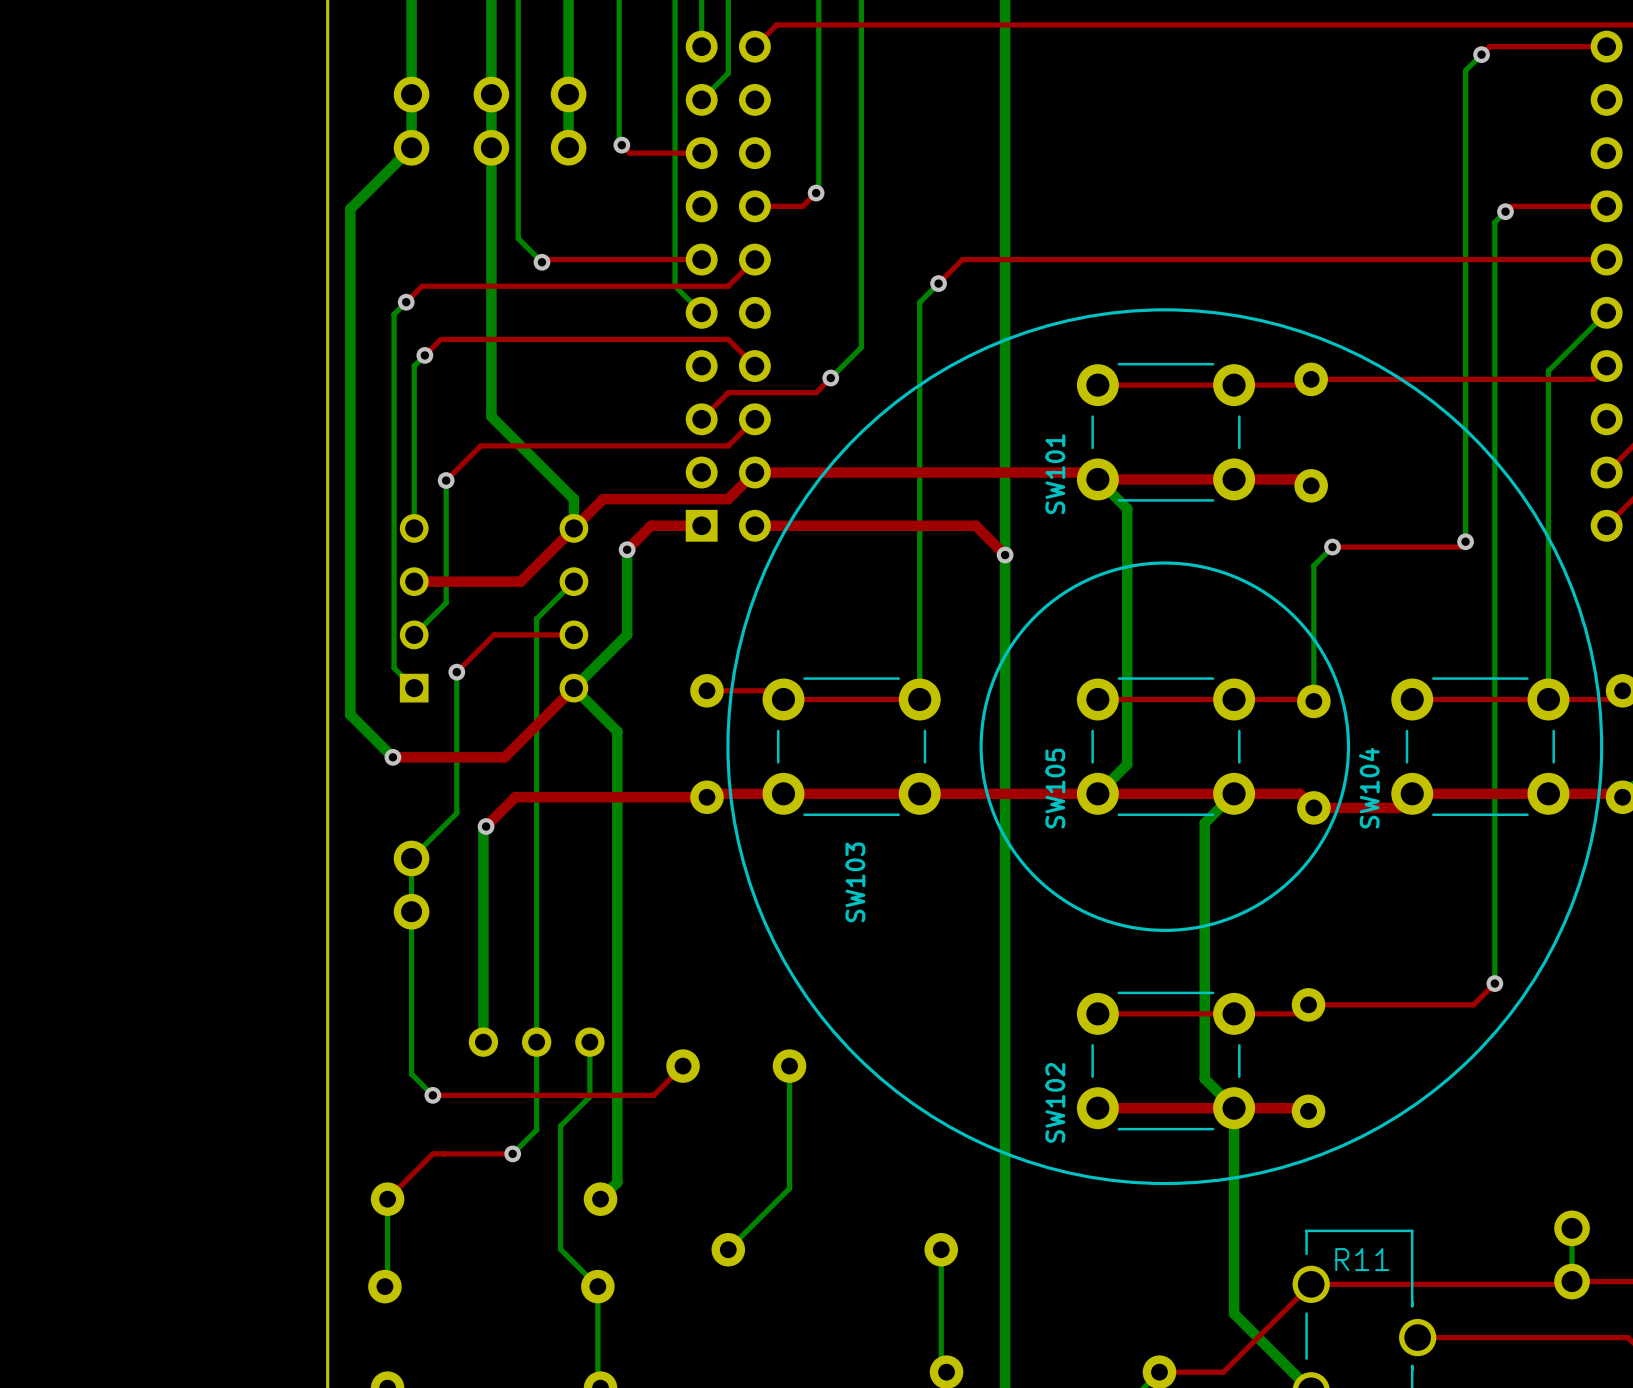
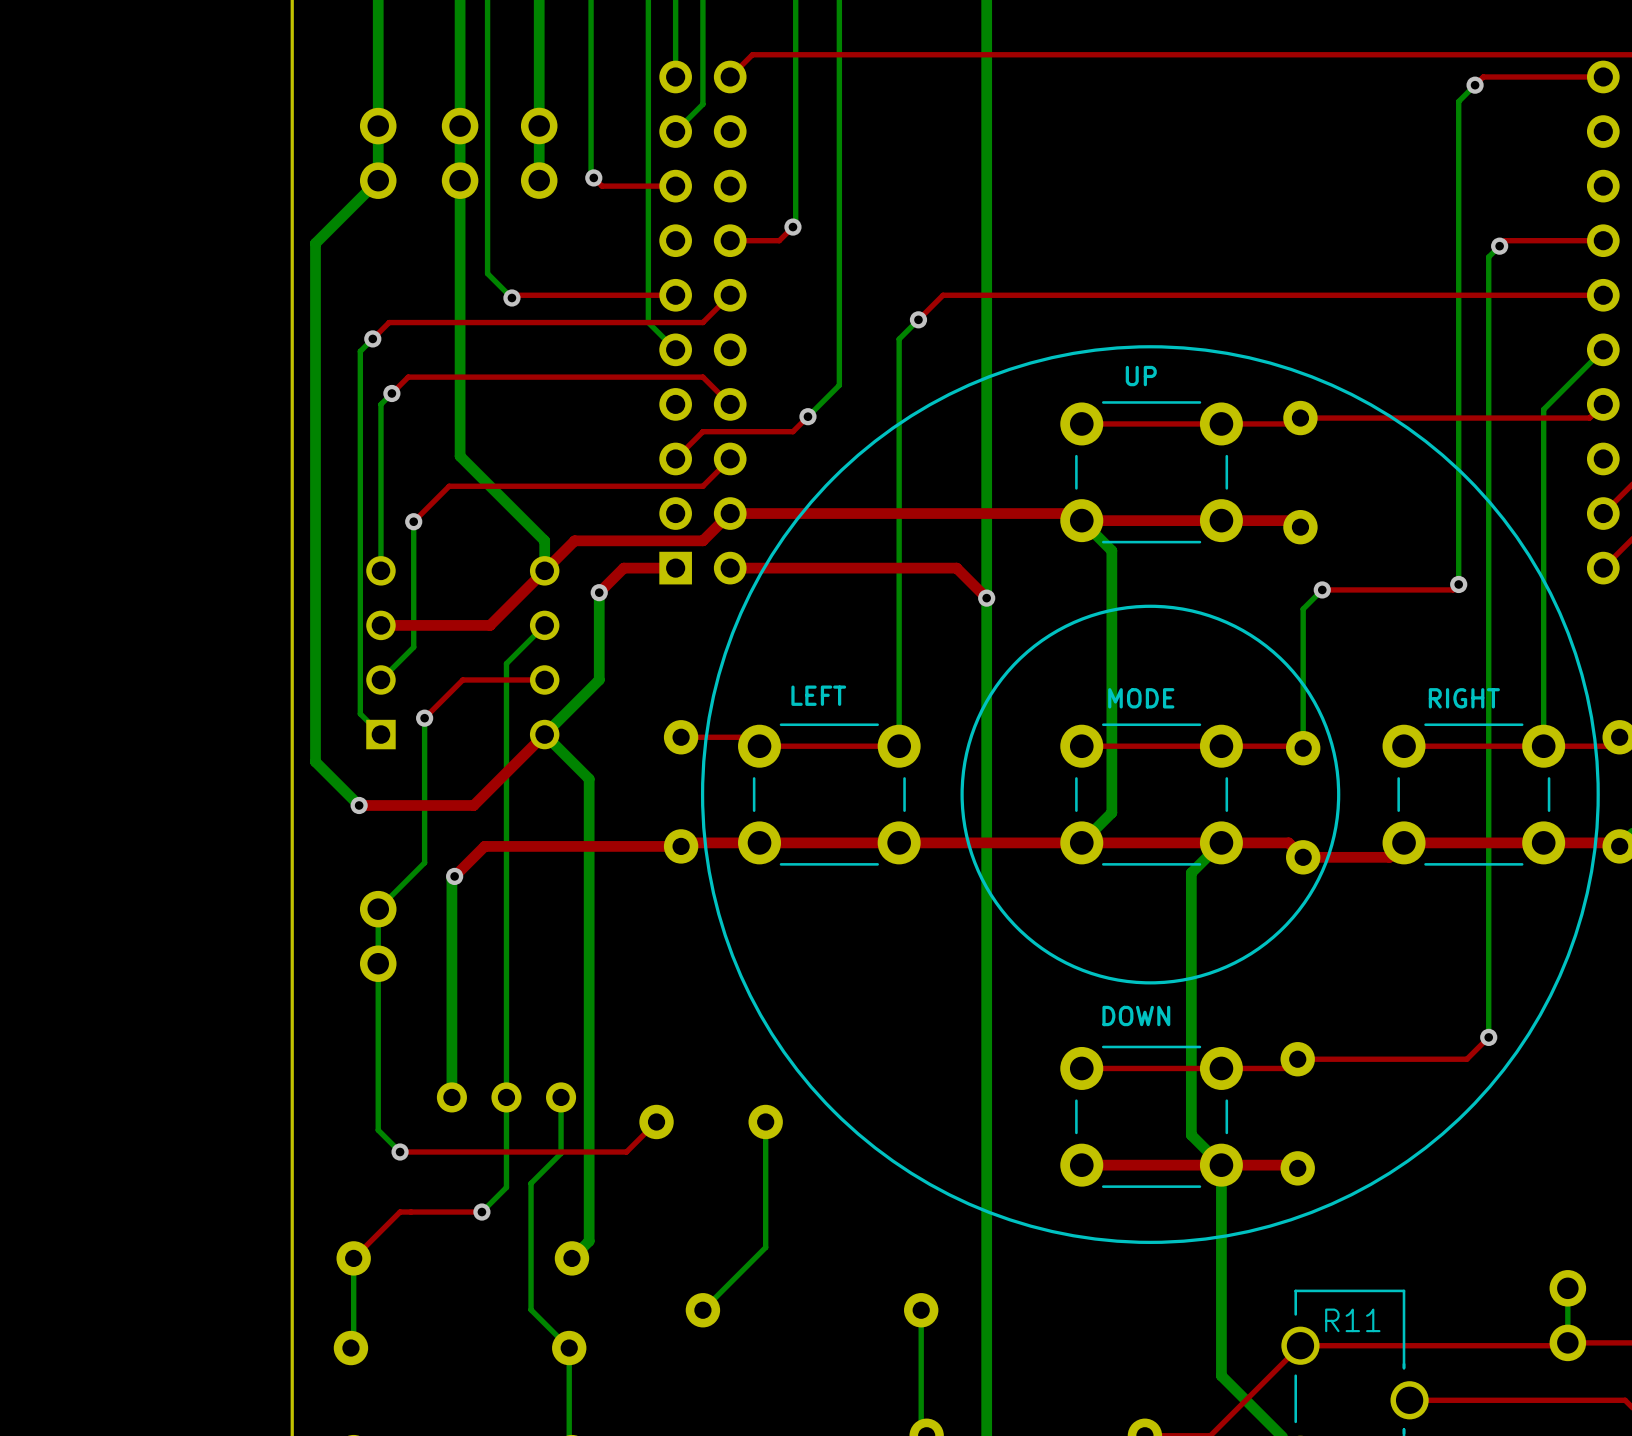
SW101 value: none -> UP (1141, 376)
SW101 name: SW101 (1055, 474) -> none
SW103 value: none -> LEFT (818, 695)
SW105 value: none -> MODE (1141, 698)
SW104 value: none -> RIGHT (1464, 698)
SW105 name: SW105 (1055, 788) -> none
SW104 name: SW104 (1369, 788) -> none
SW103 name: SW103 (855, 882) -> none
SW102 value: none -> DOWN (1136, 1015)
SW102 name: SW102 (1055, 1102) -> none

